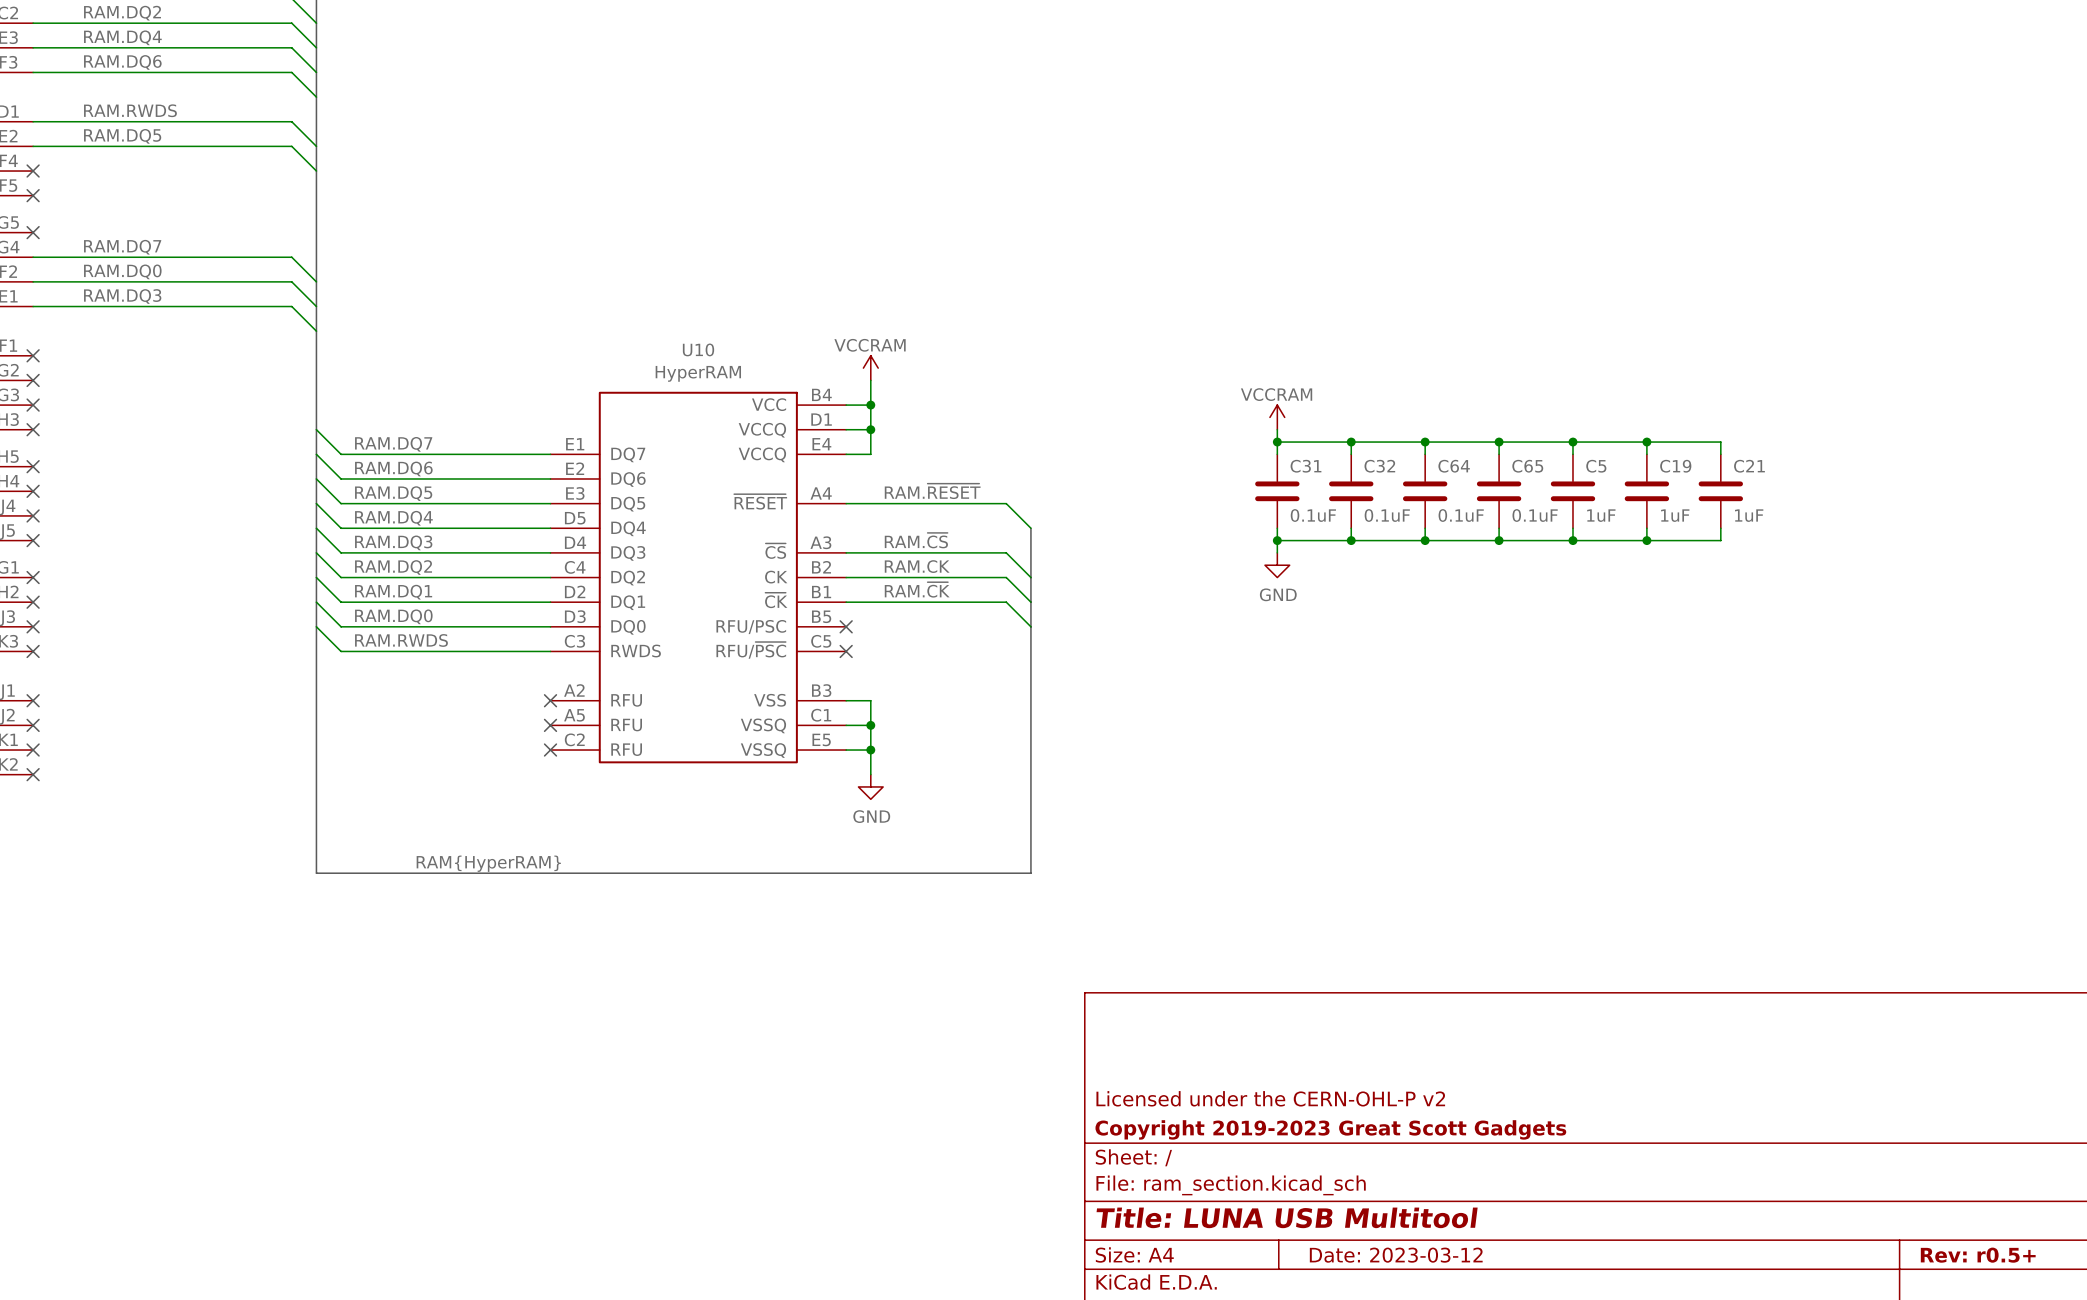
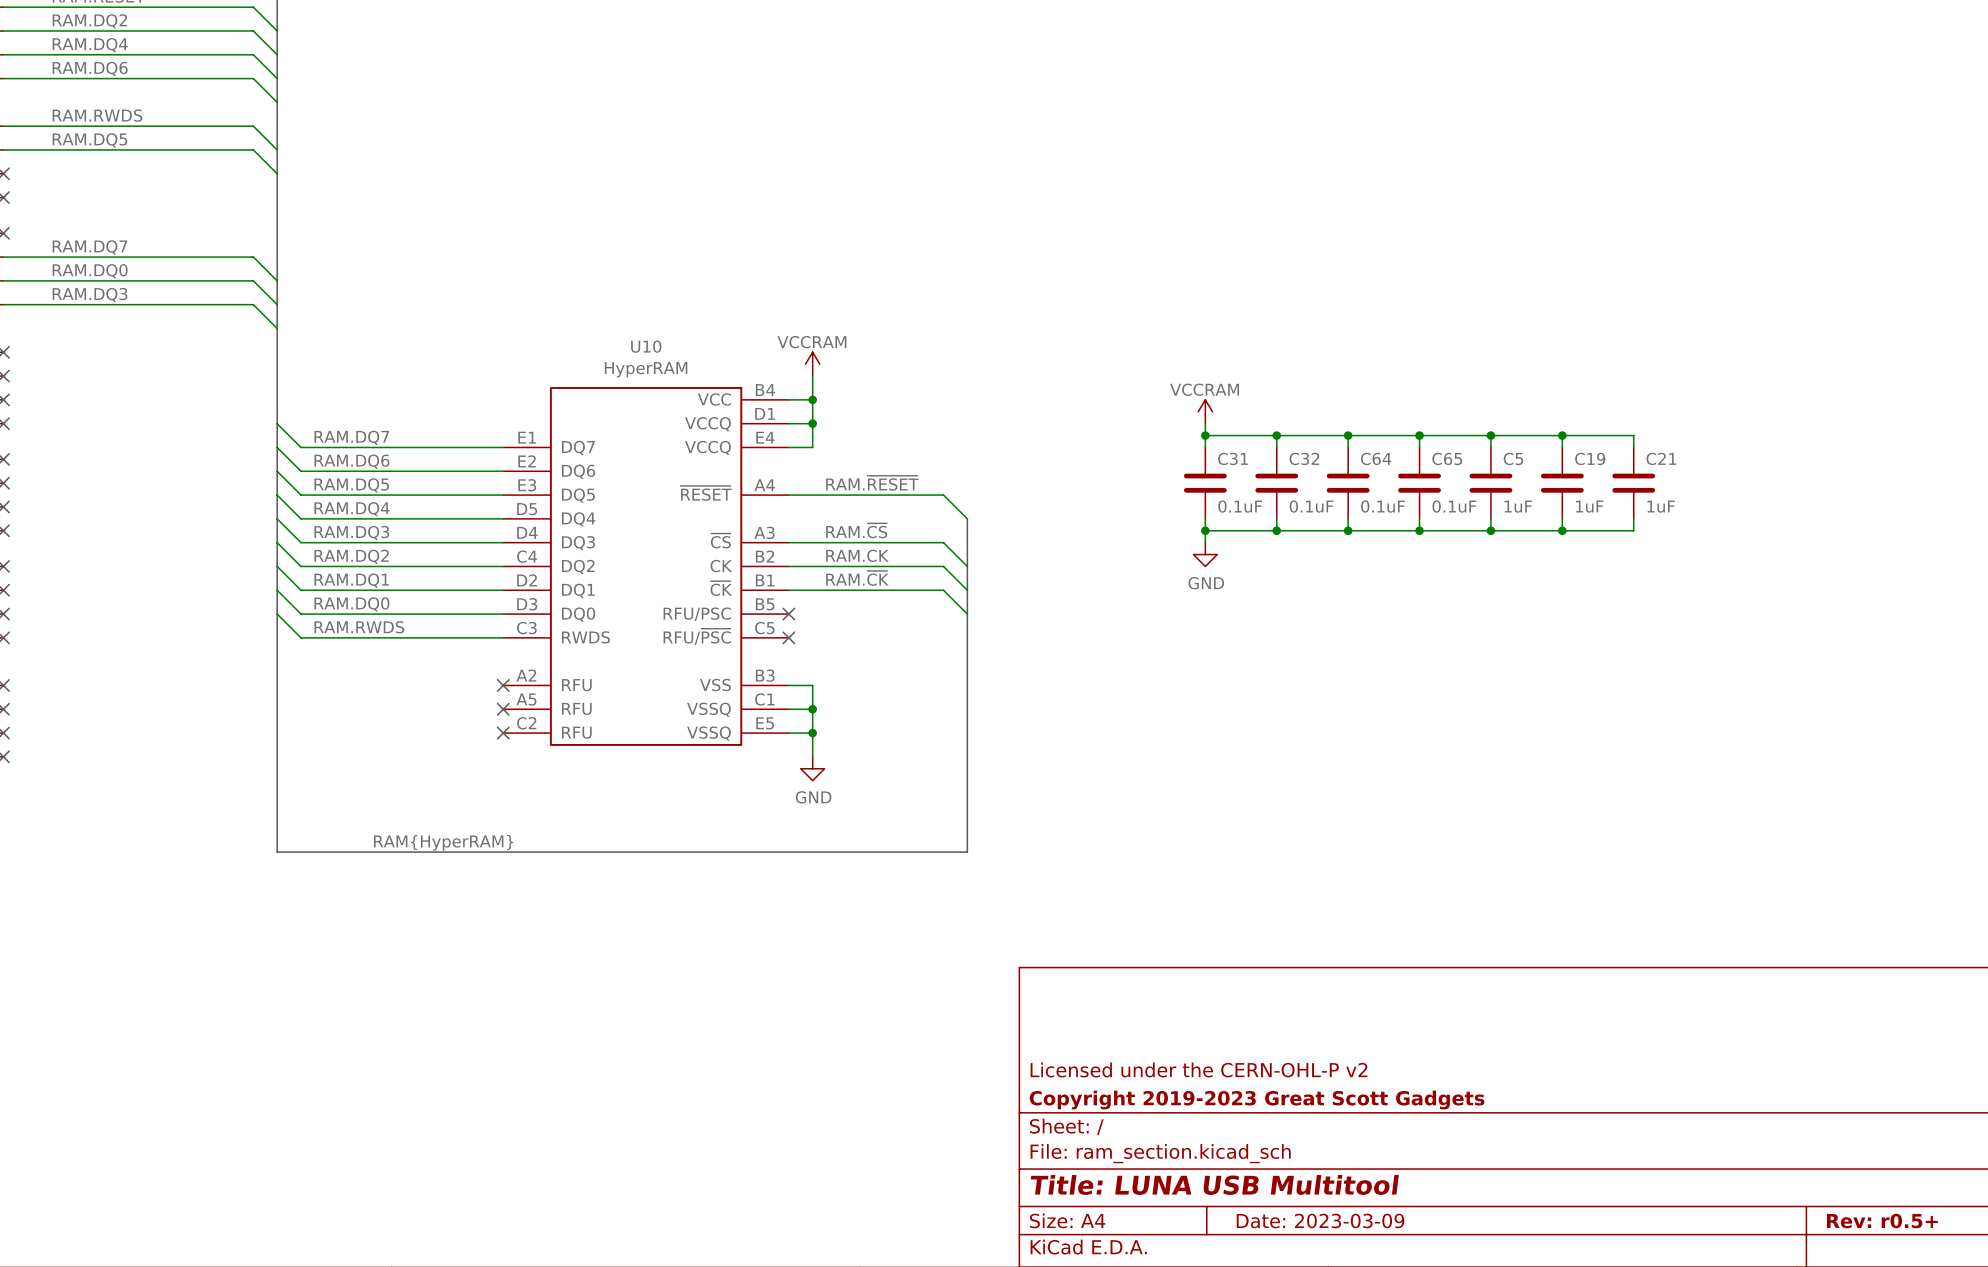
title block: Date: 2023-03-12 (1396, 1255) -> Date: 2023-03-09 (1320, 1220)

